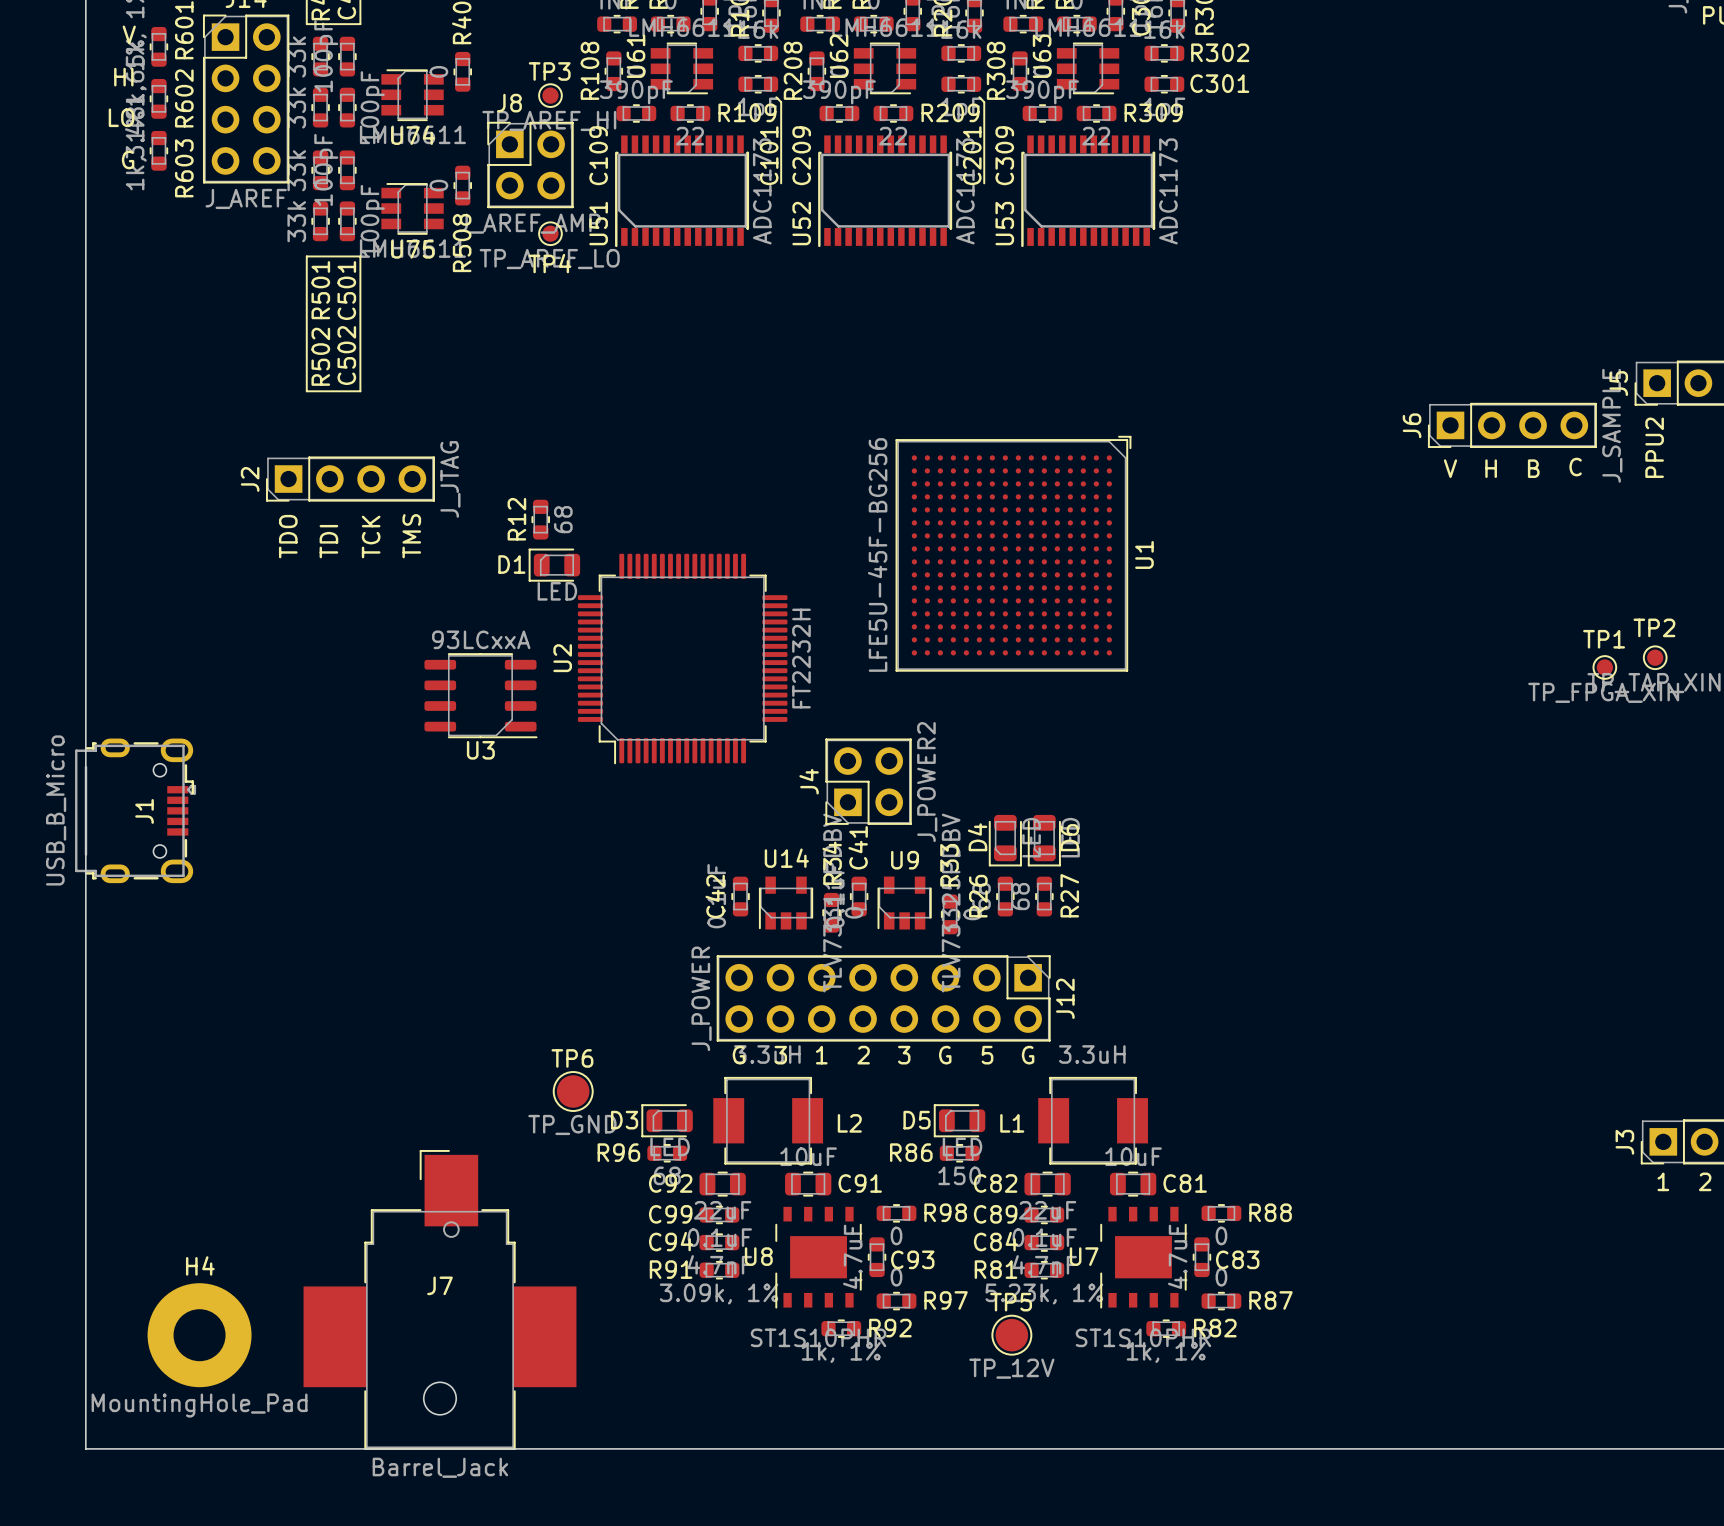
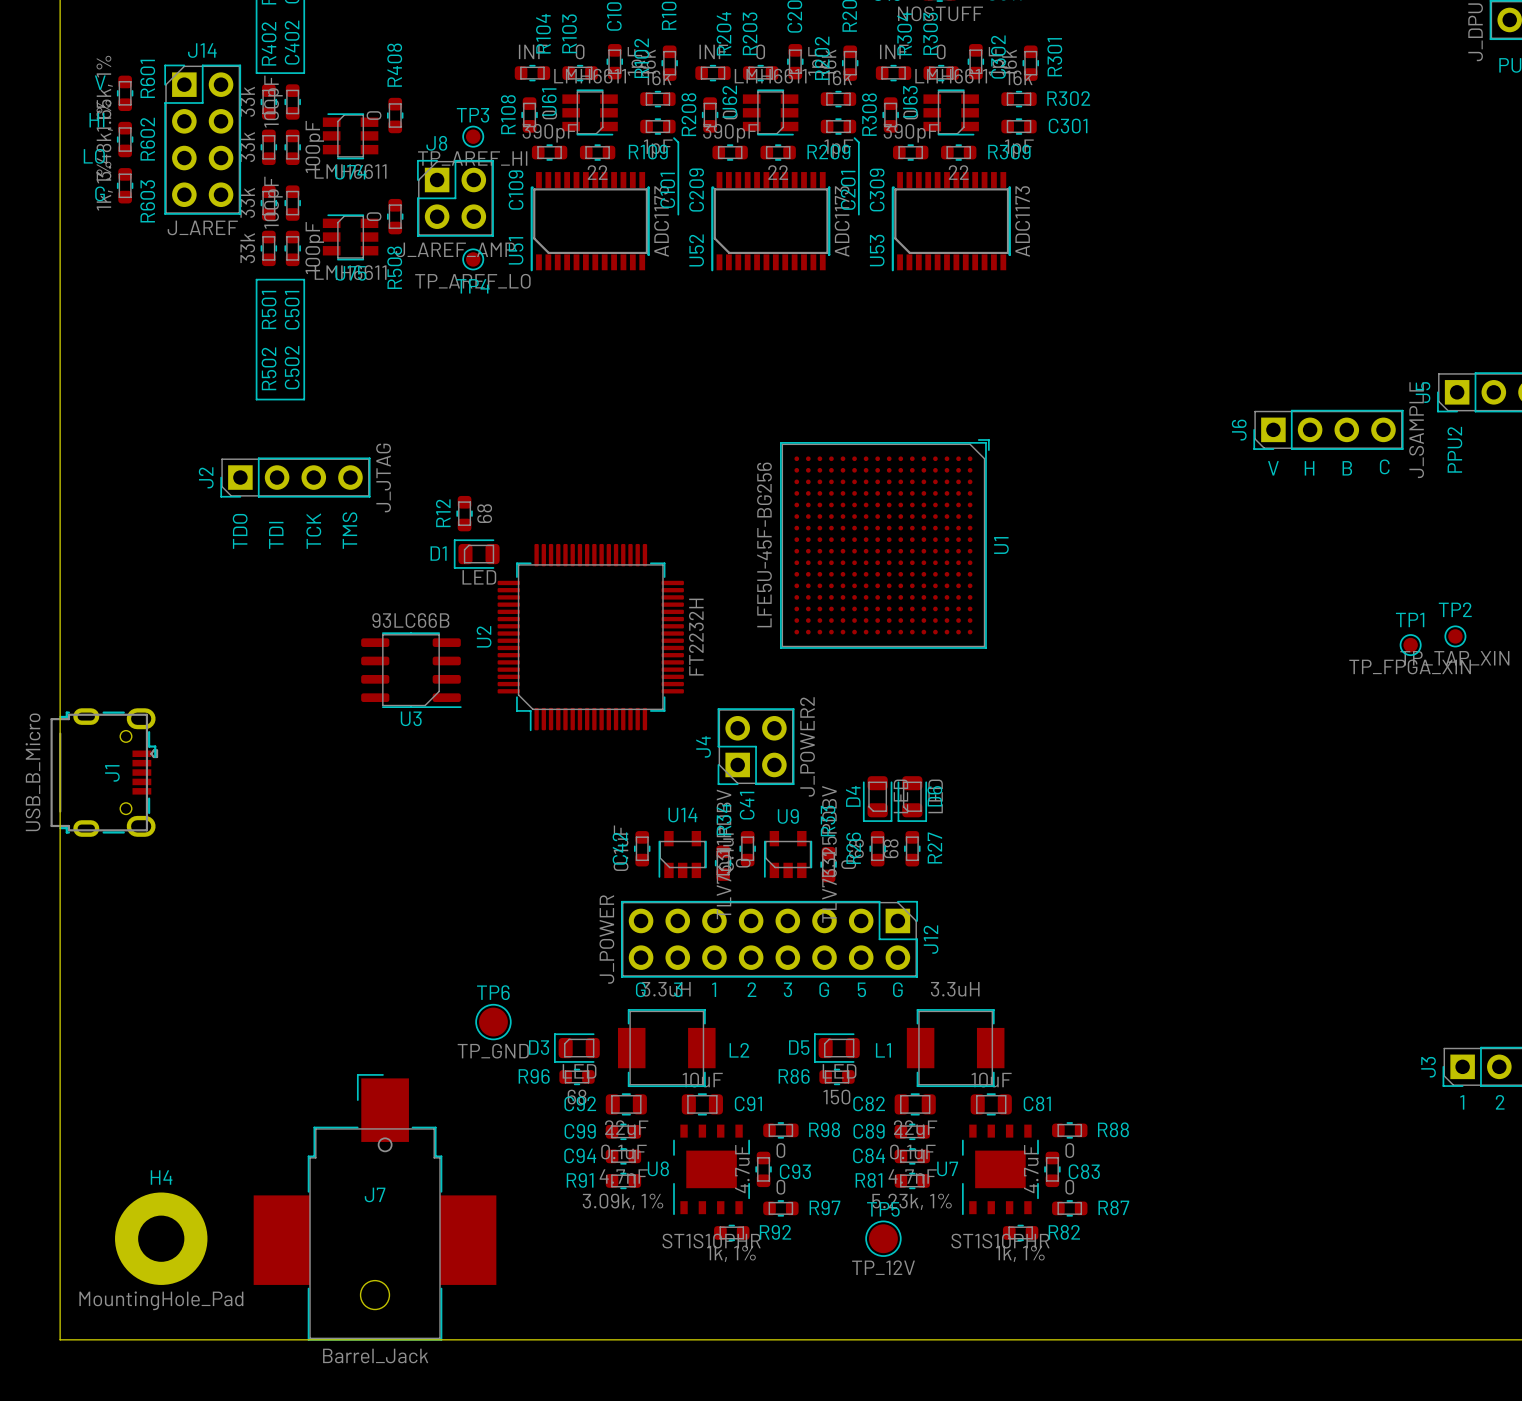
U3 value: 93LCxxA (481, 639) -> 93LC66B (410, 620)

